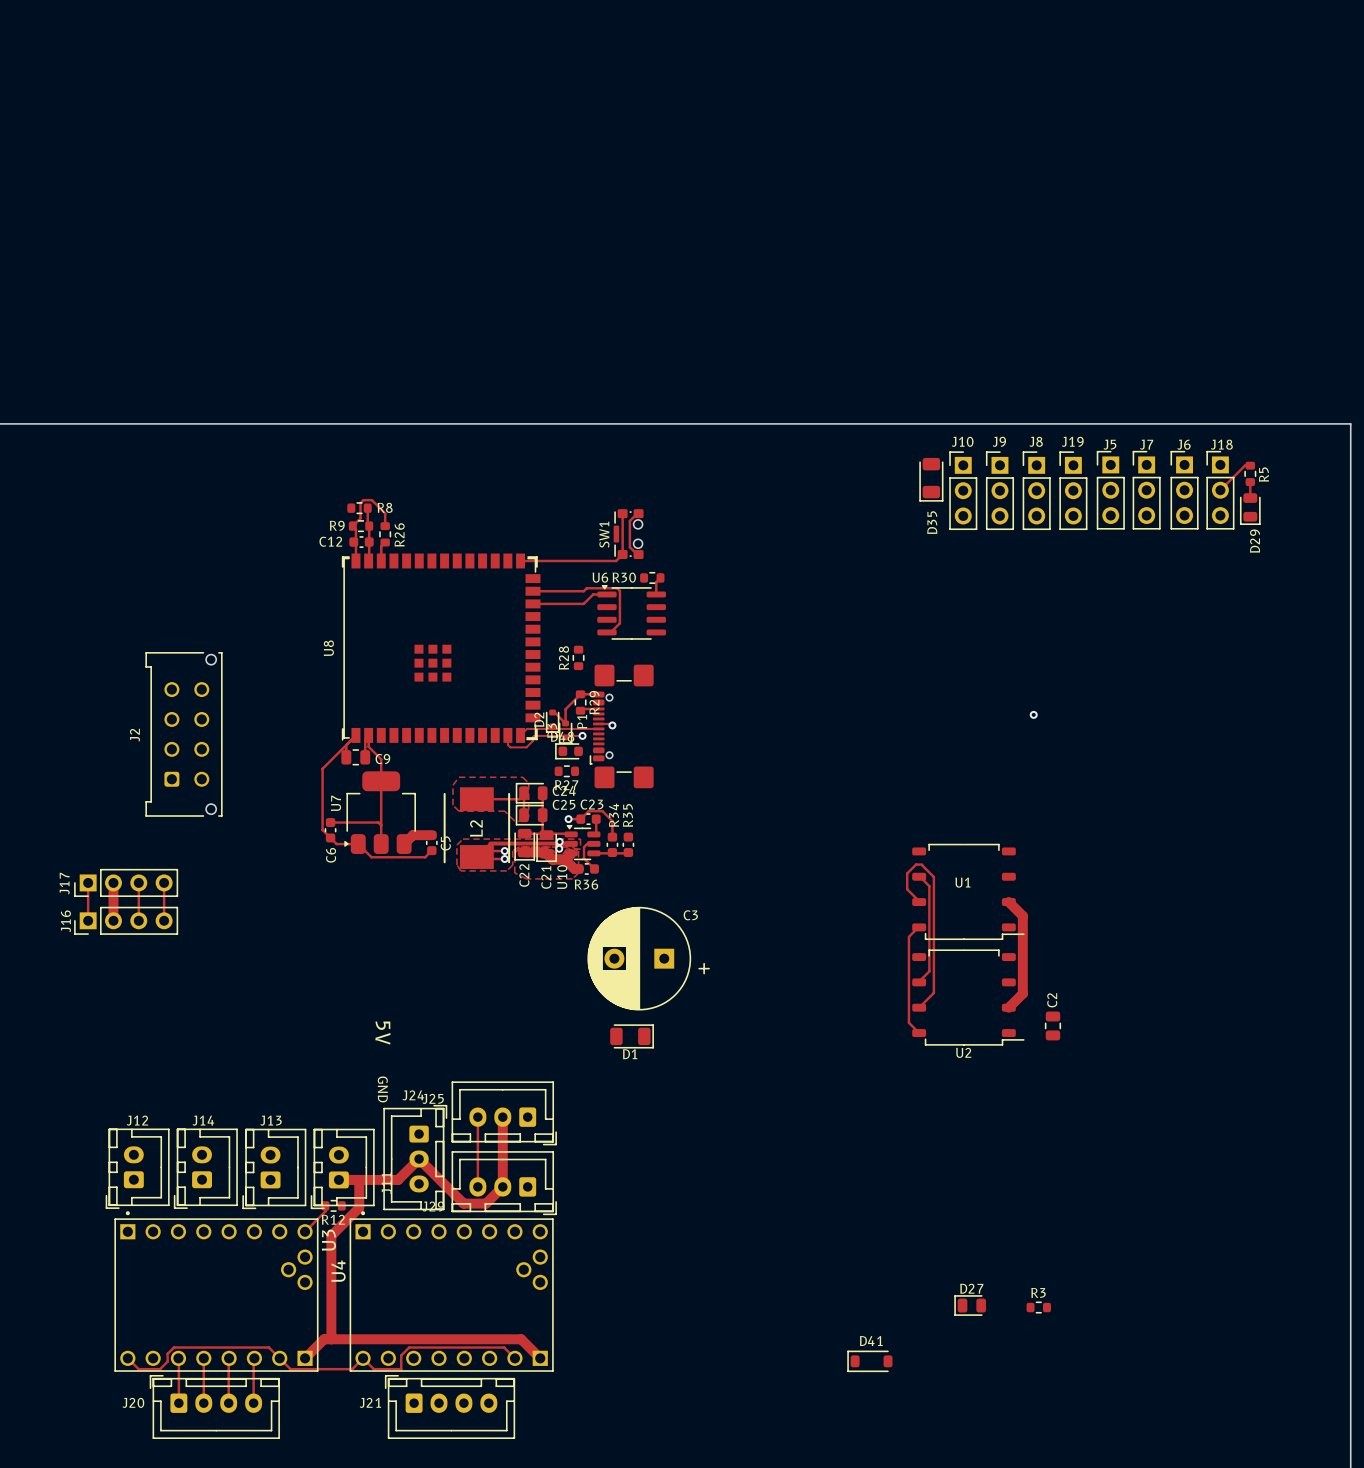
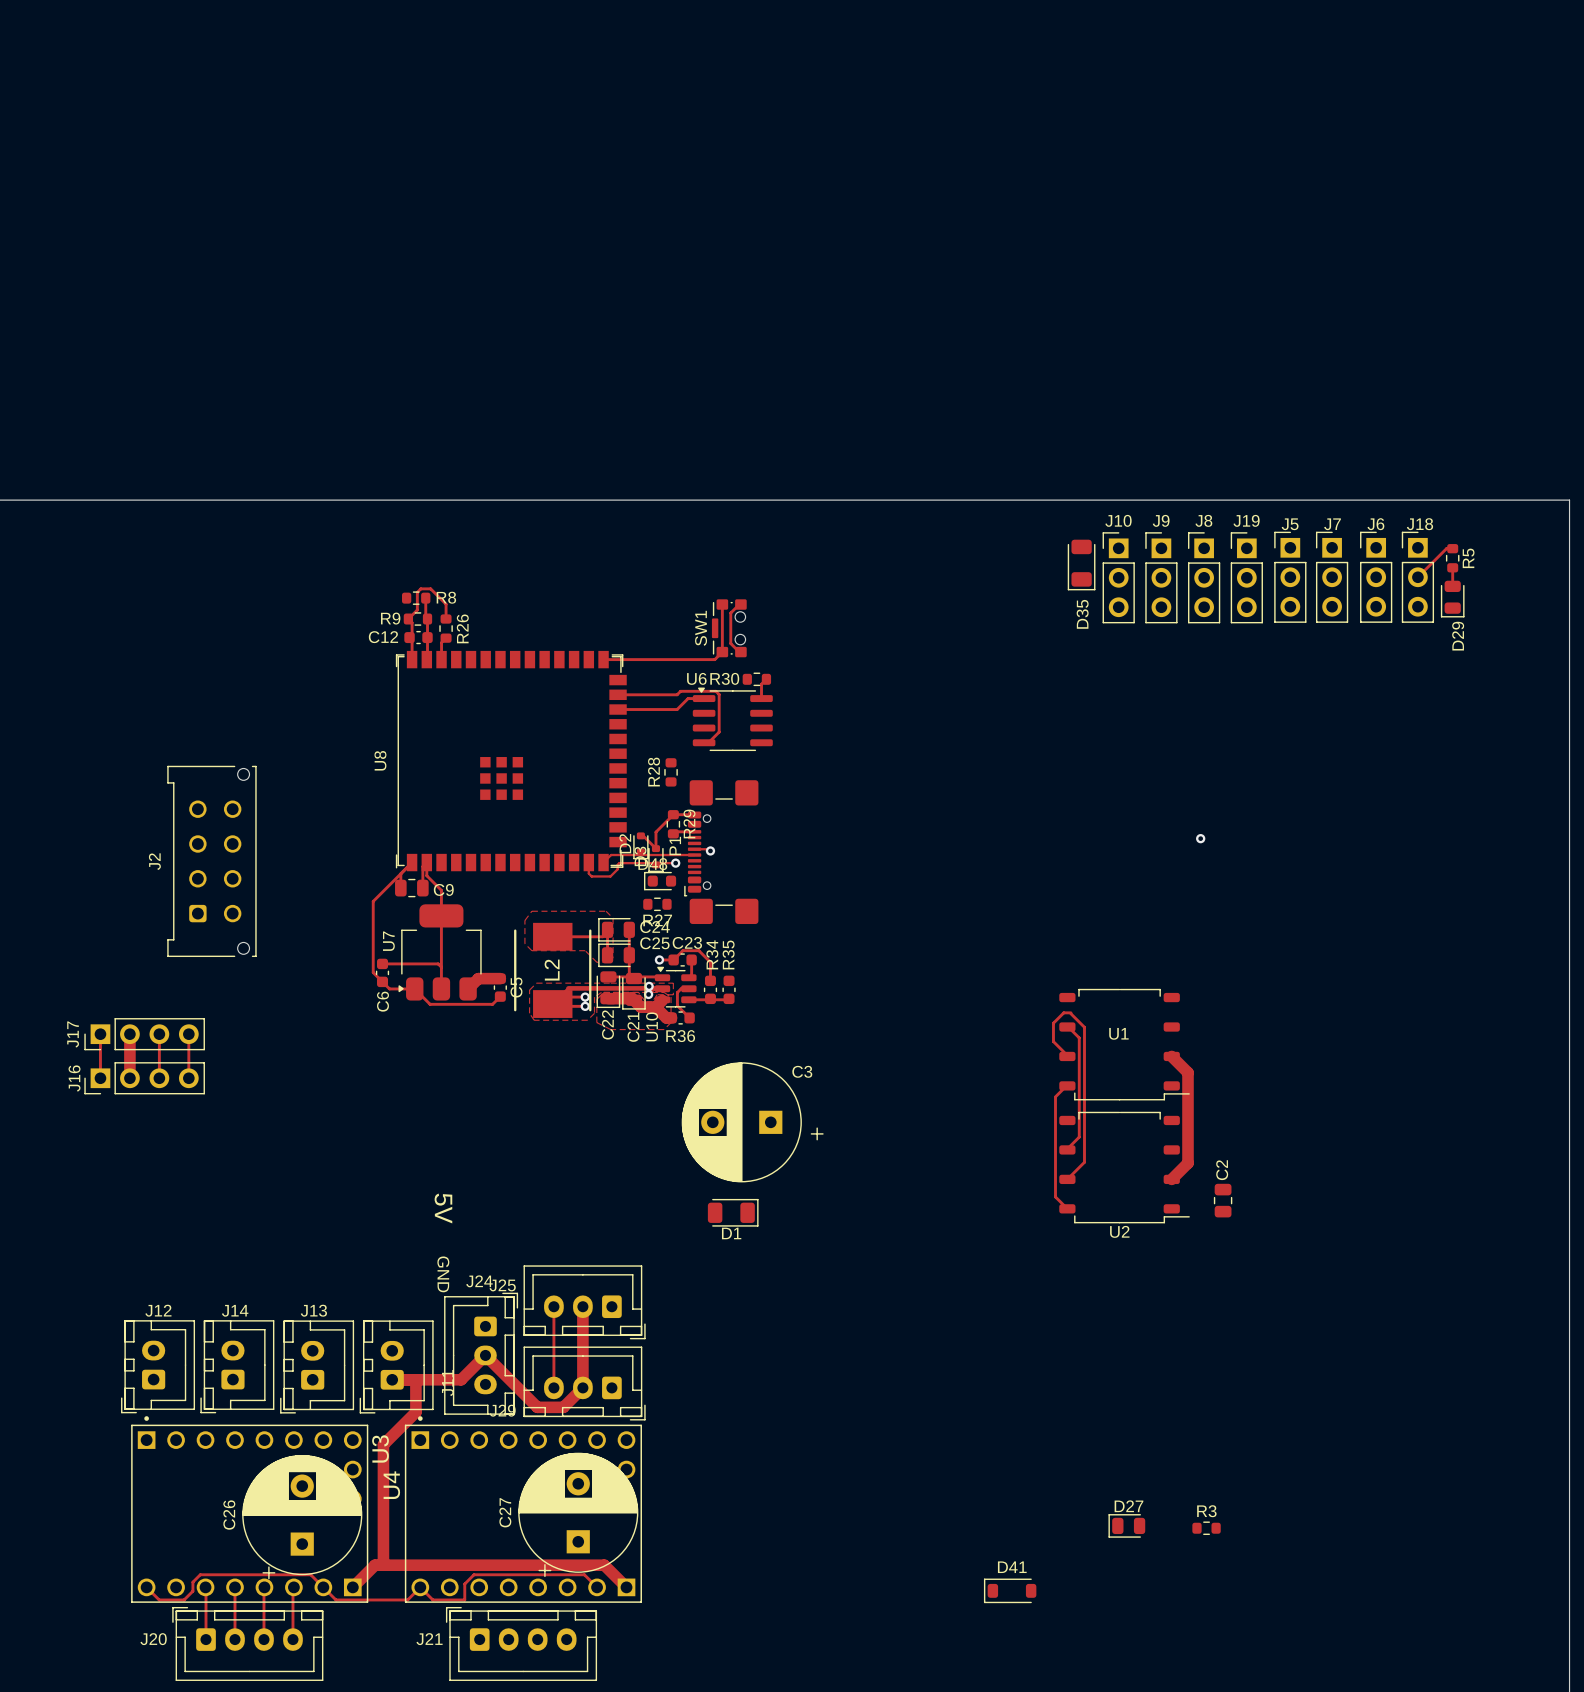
track: (325, 1205) (325, 1211) (305, 1231) -> none
R12: (333, 1205) -> none
C27: none -> (578, 1514)
C26: none -> (302, 1517)

